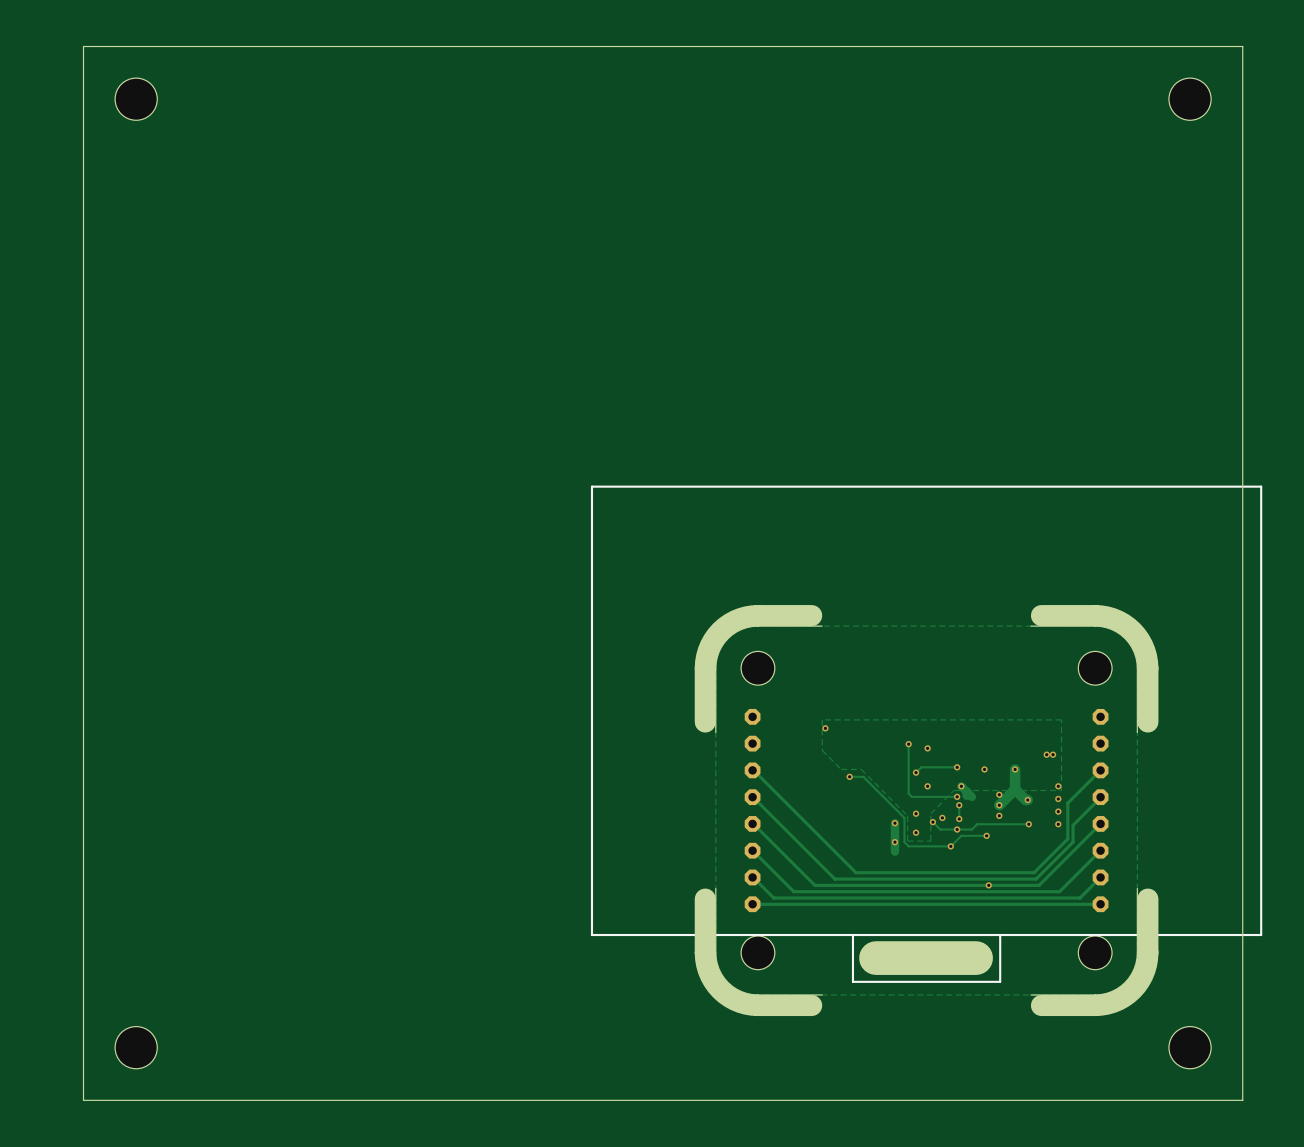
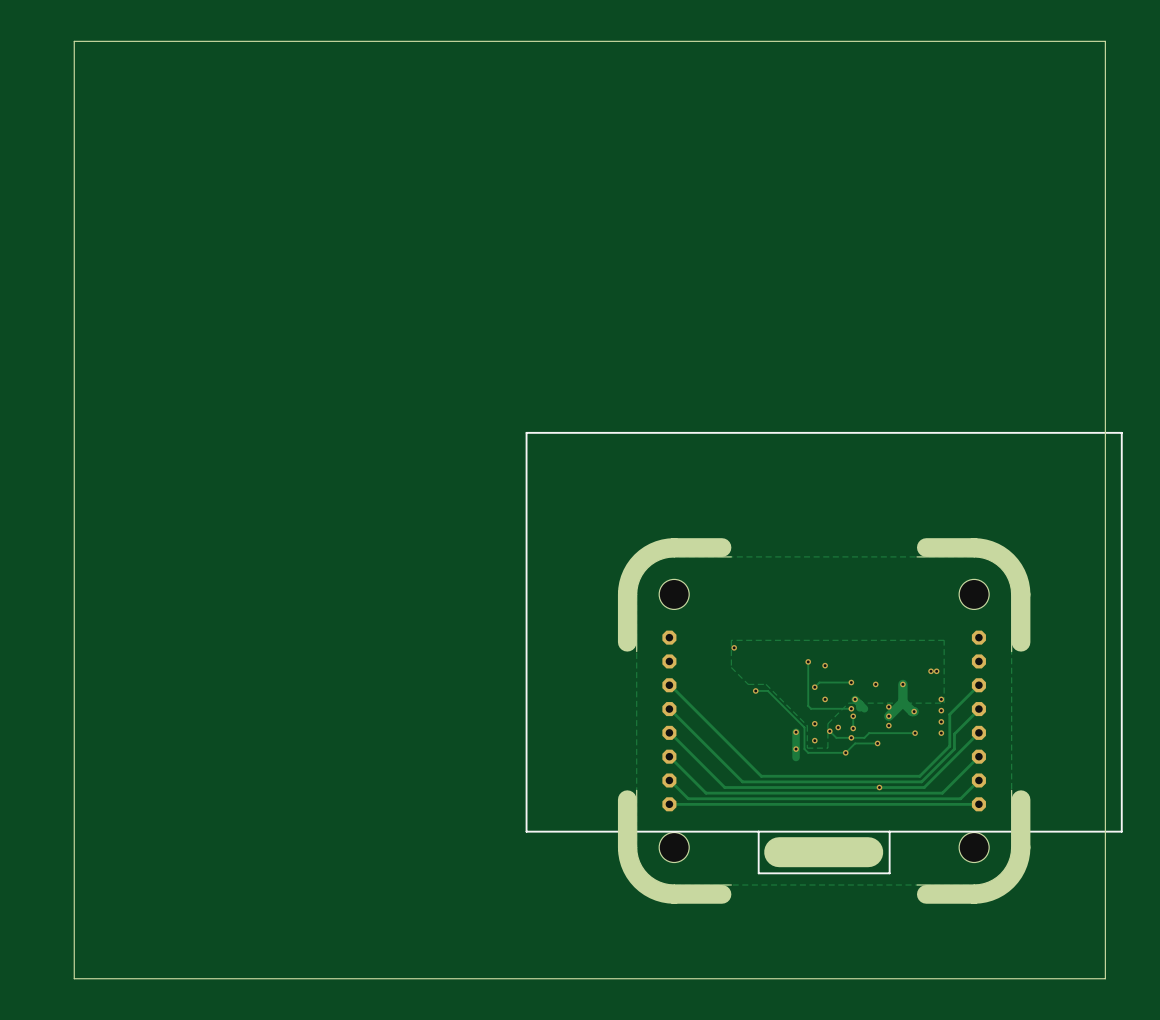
hole: (136, 99) -> none
hole: (1190, 99) -> none
hole: (136, 1047) -> none
hole: (1190, 1047) -> none

